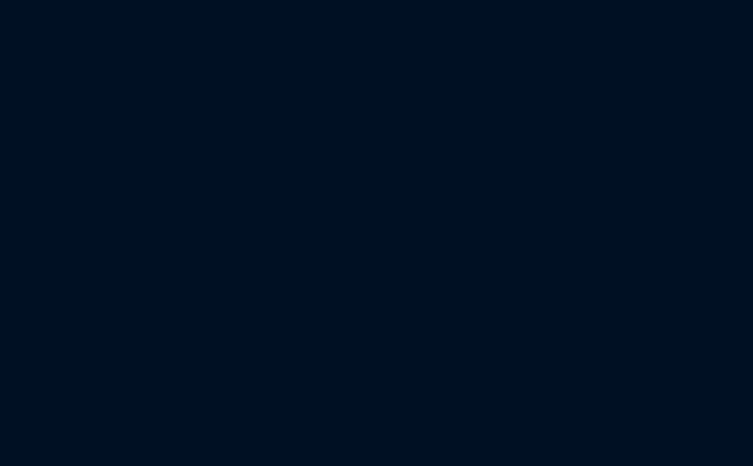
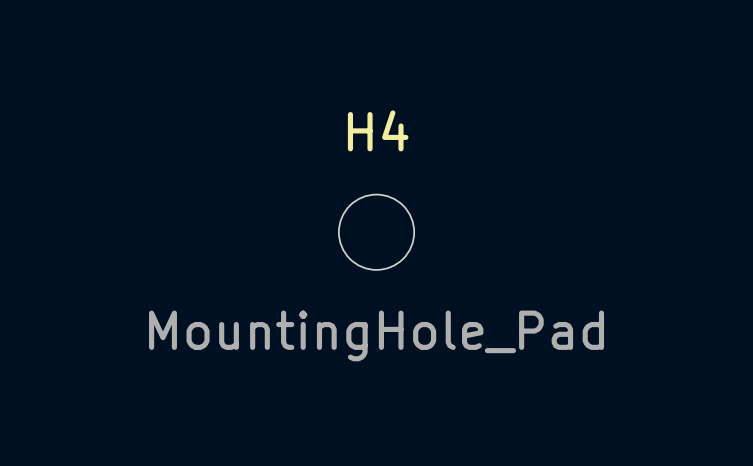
H4: none -> MountingHole_Pad (376, 232)

